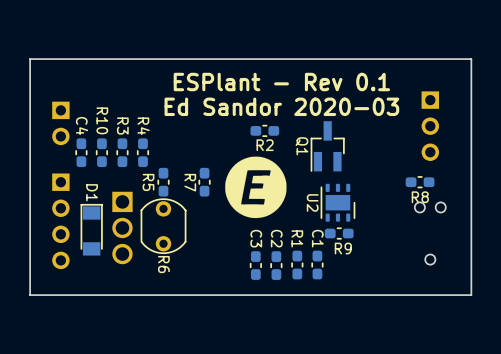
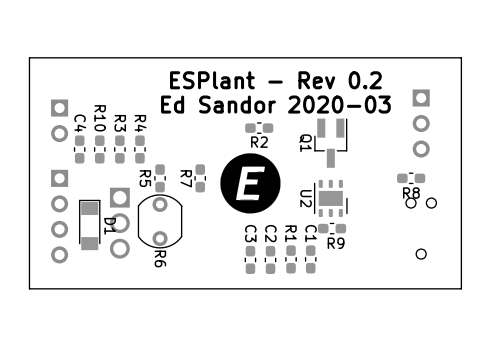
text: ESPlant - Rev 0.1 (281, 82) -> ESPlant - Rev 0.2 (275, 80)
Q1 rotation: 0° (327, 146) -> 180° (330, 143)
D1 name position: D1 (92, 192) -> D1 (110, 226)

